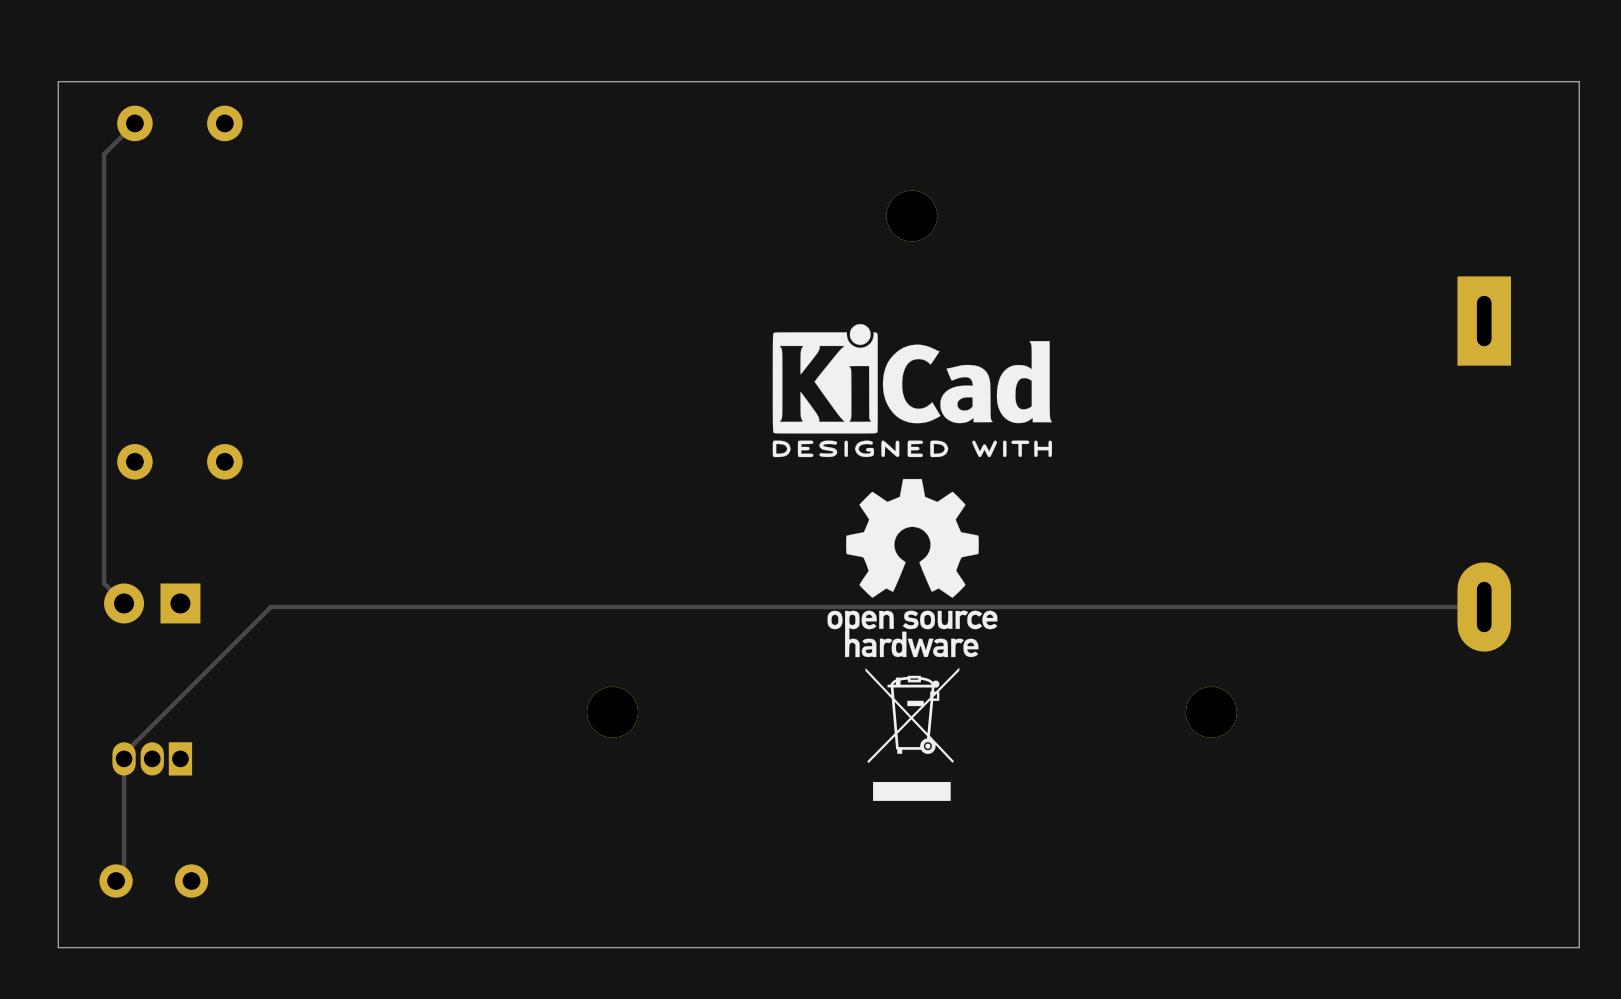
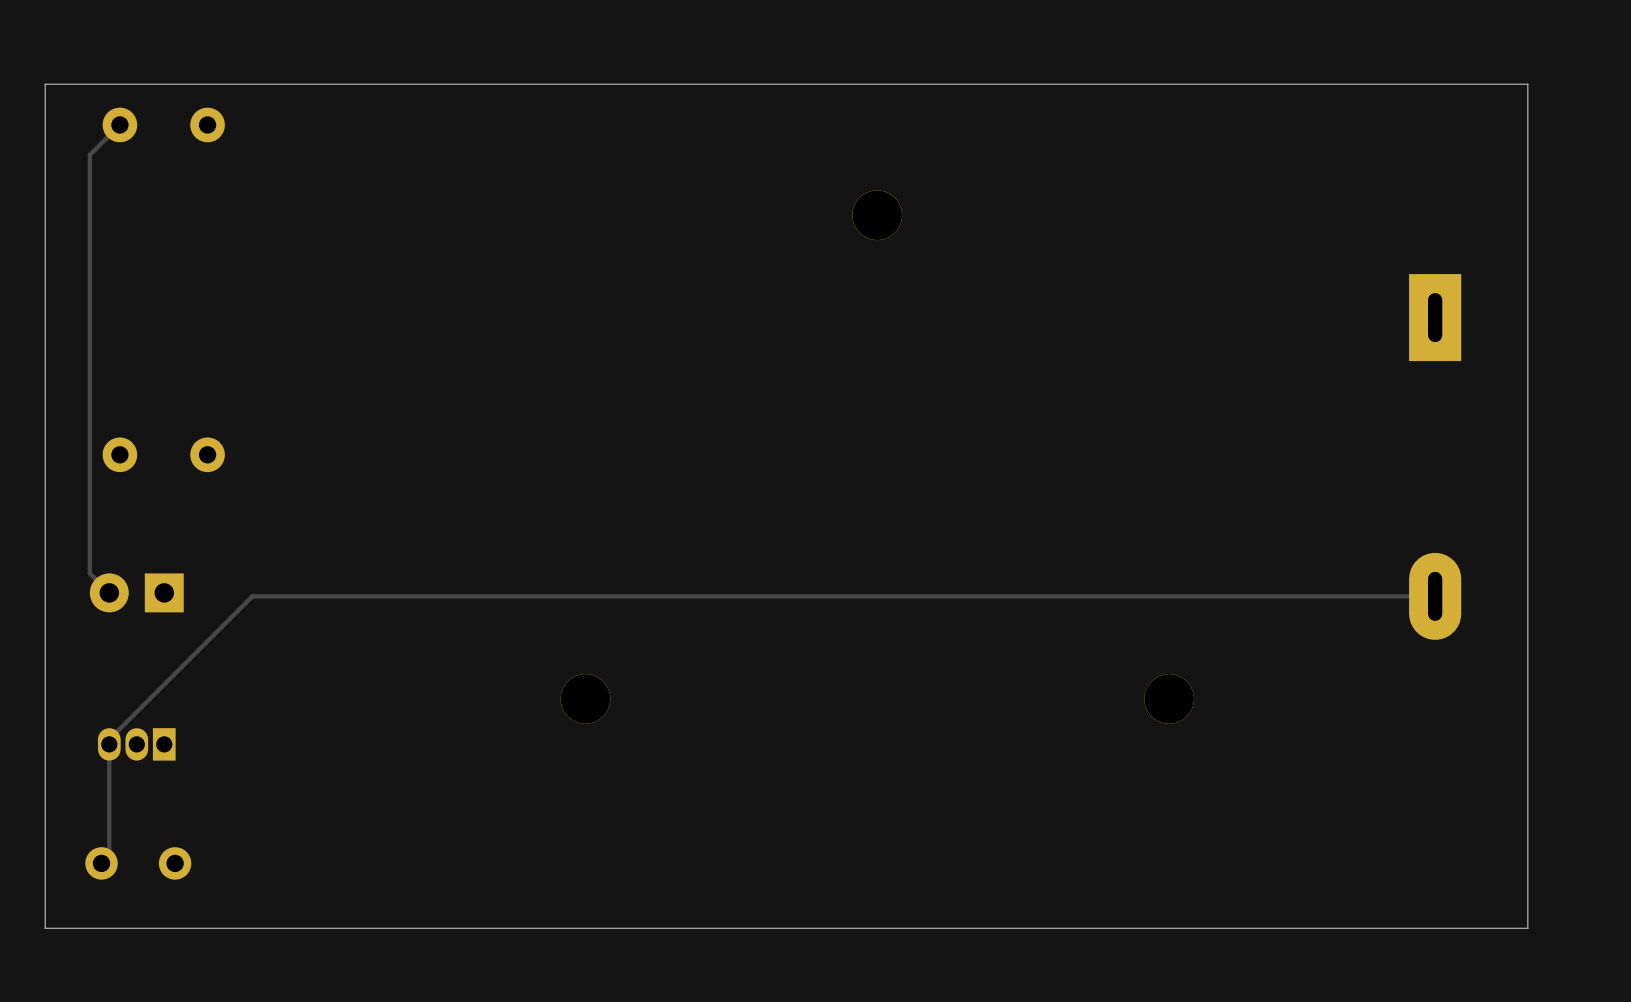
drawing: [772, 324, 1053, 801] -> none

